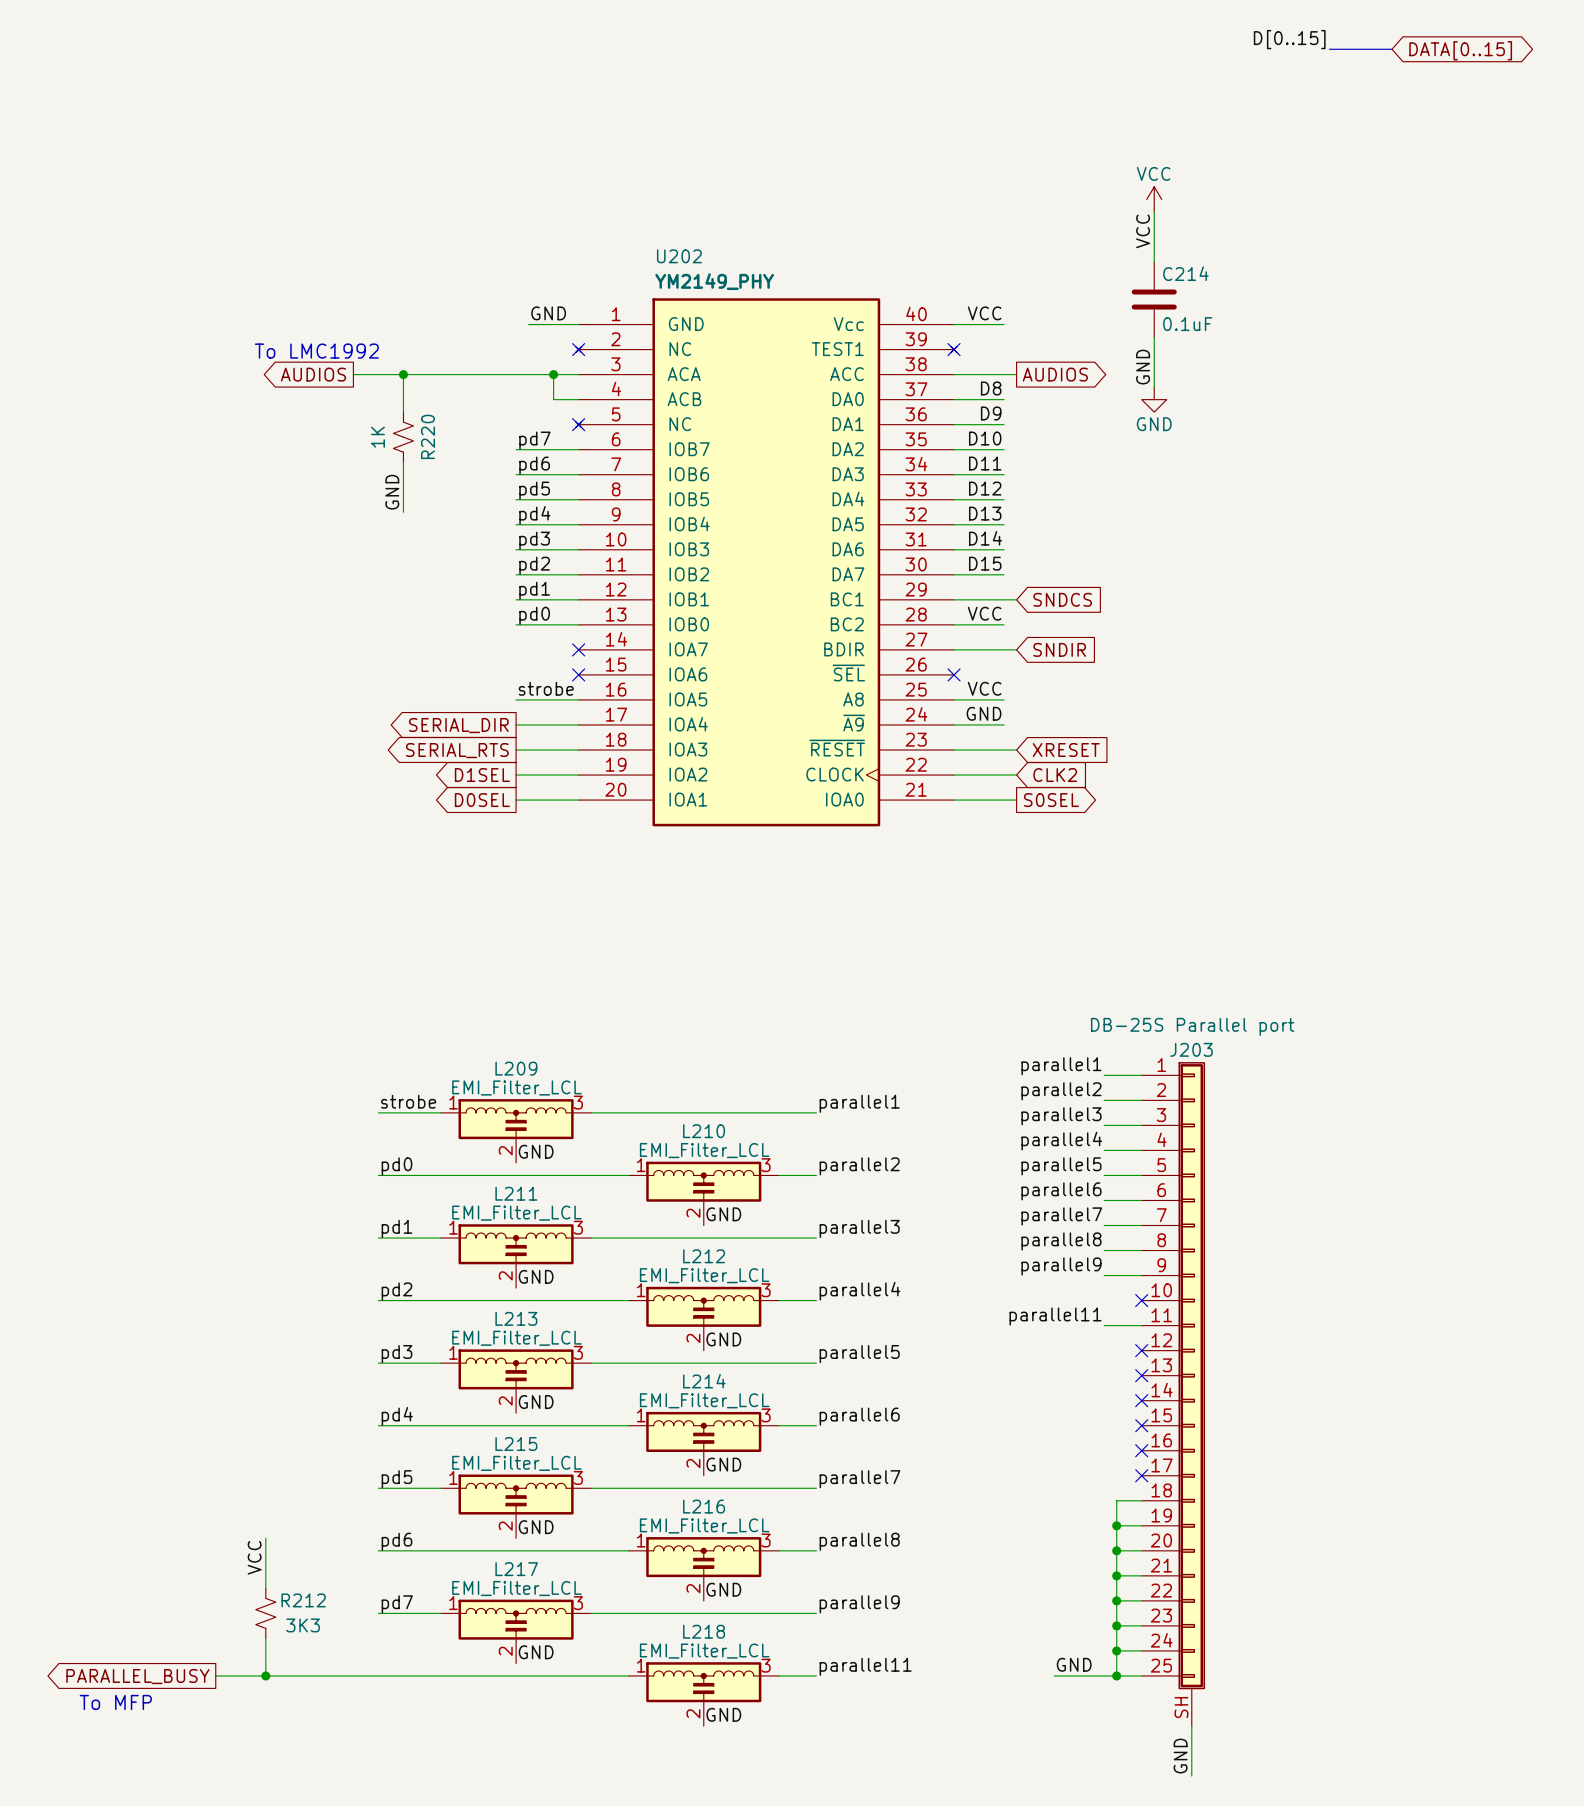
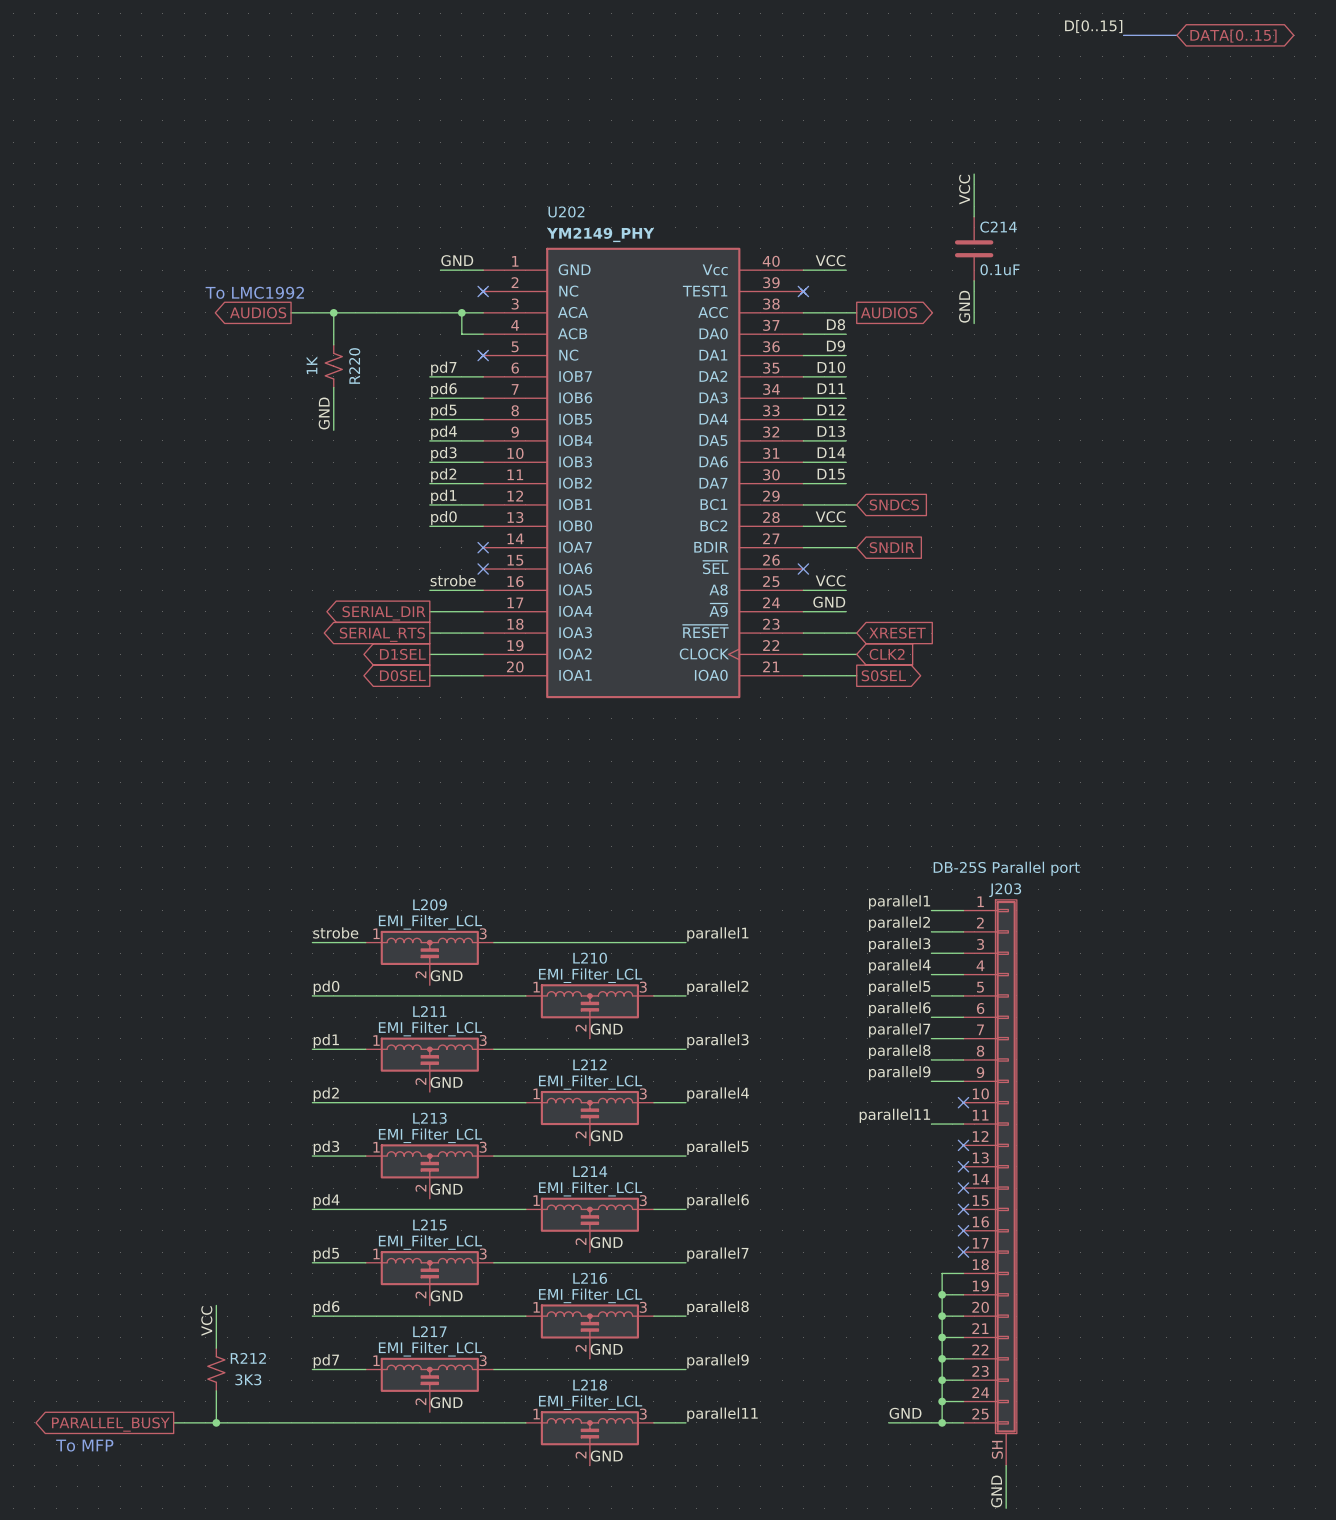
power symbol: VCC (1154, 199) -> none
power symbol: GND (1154, 399) -> none

